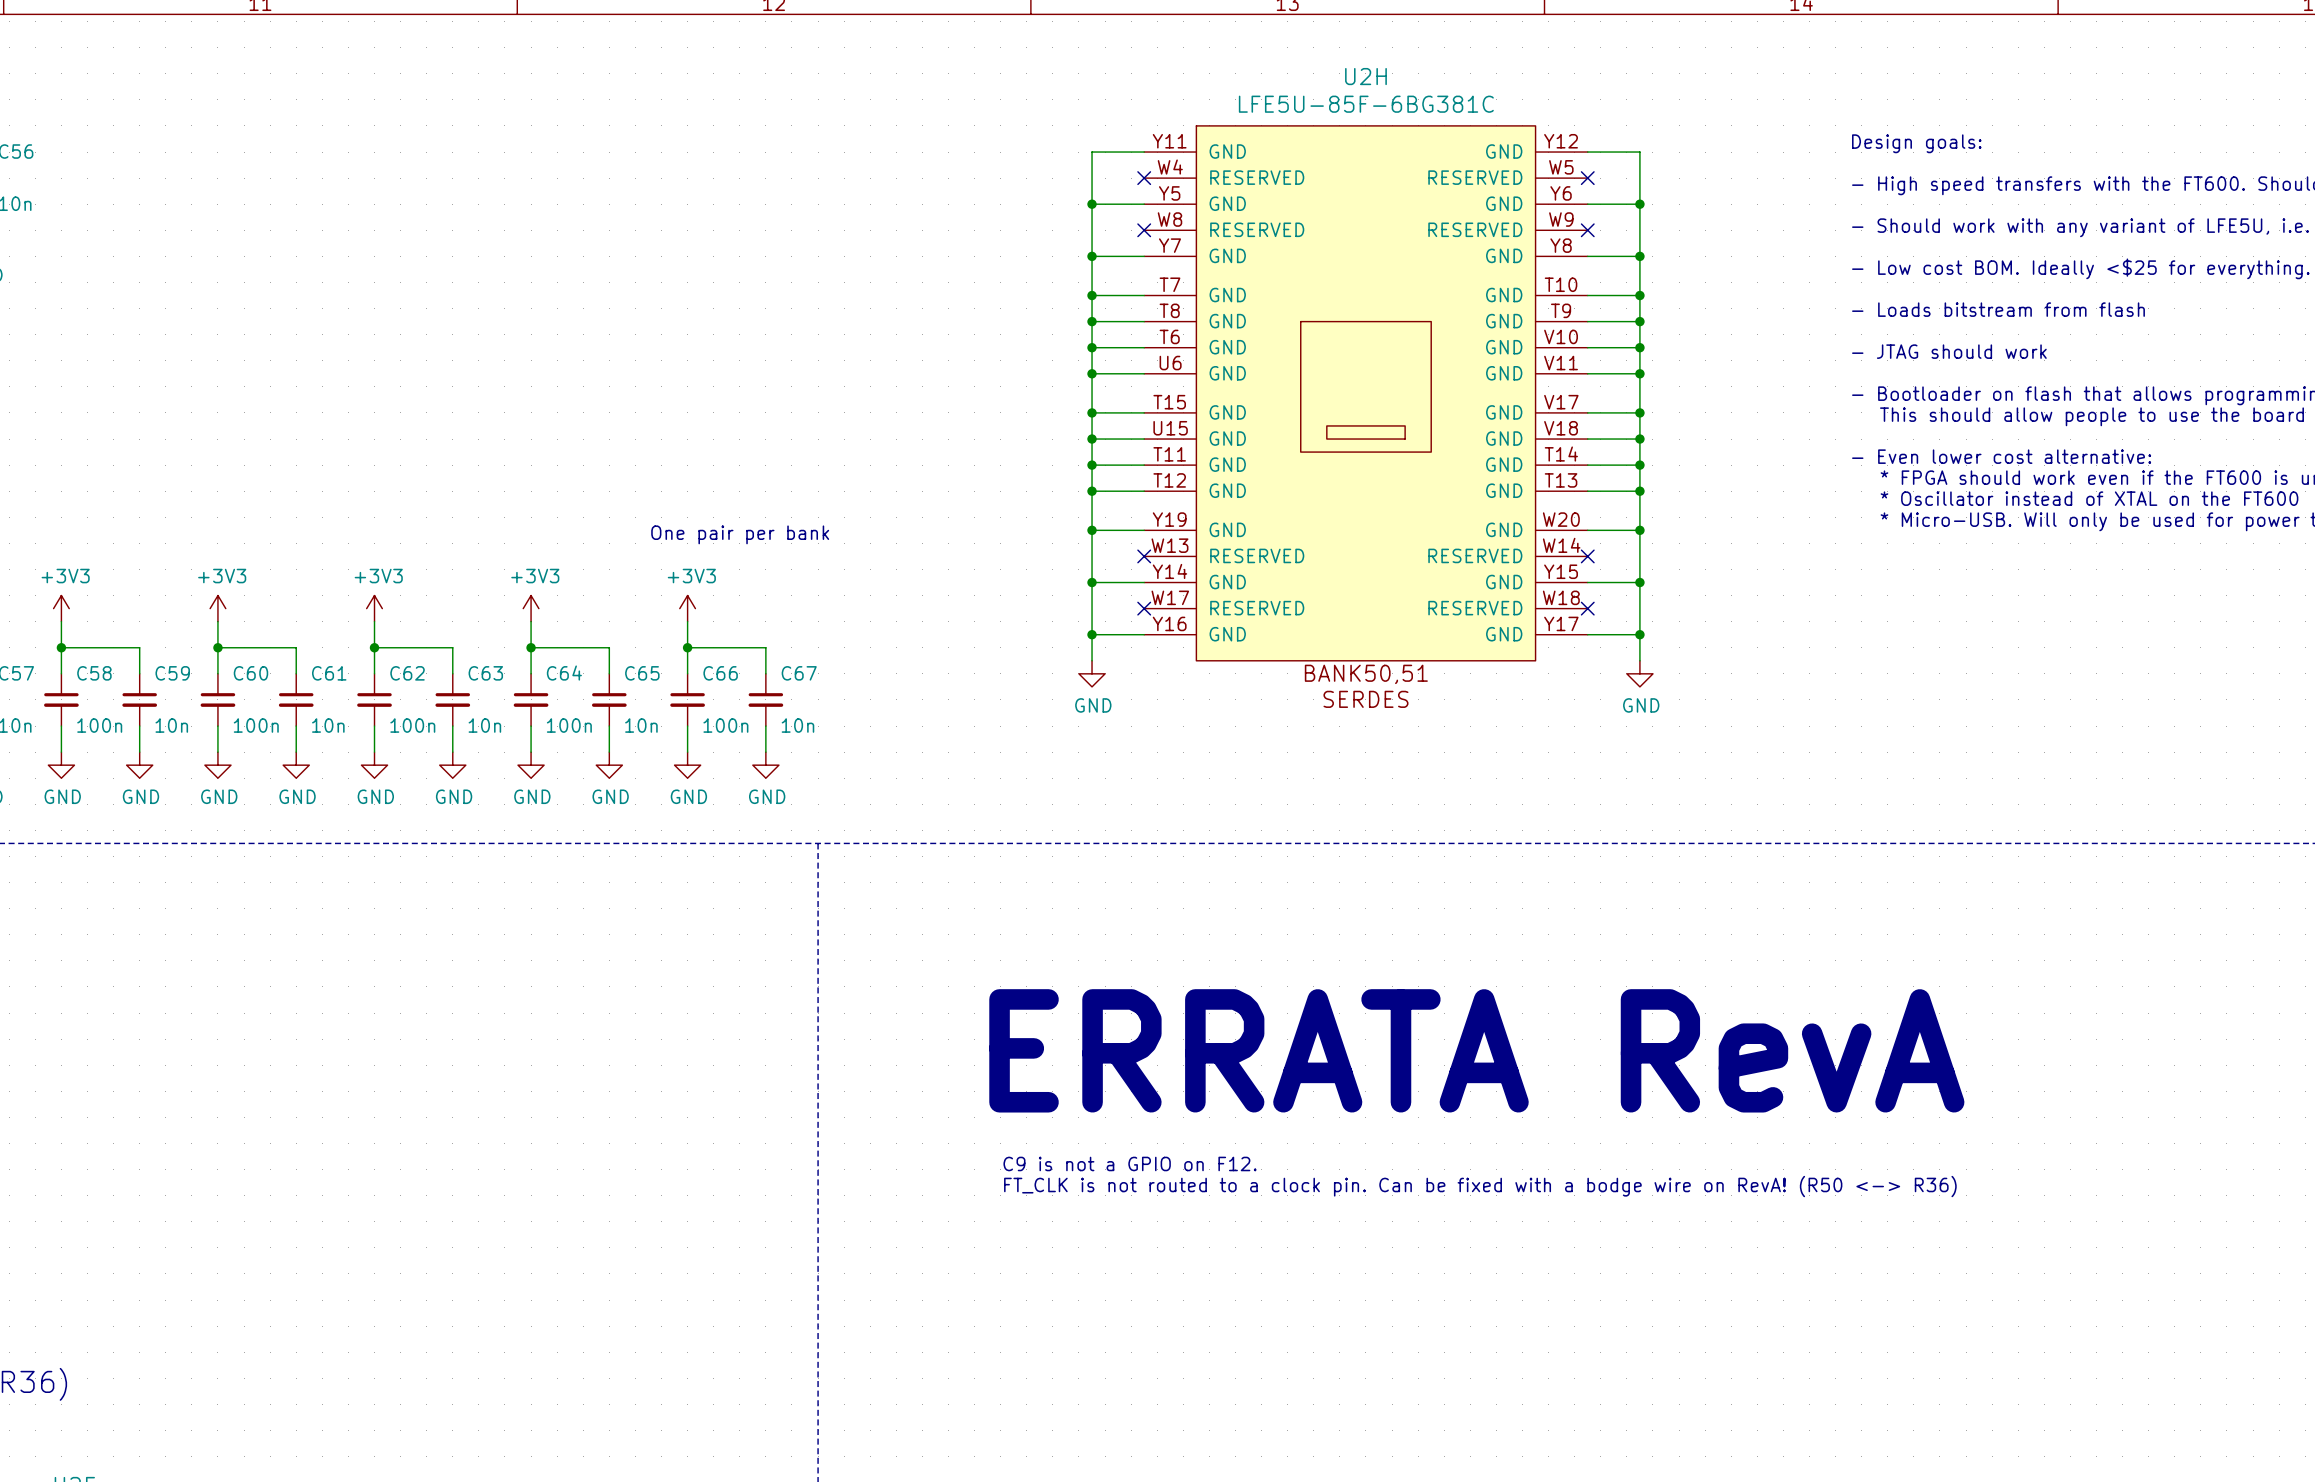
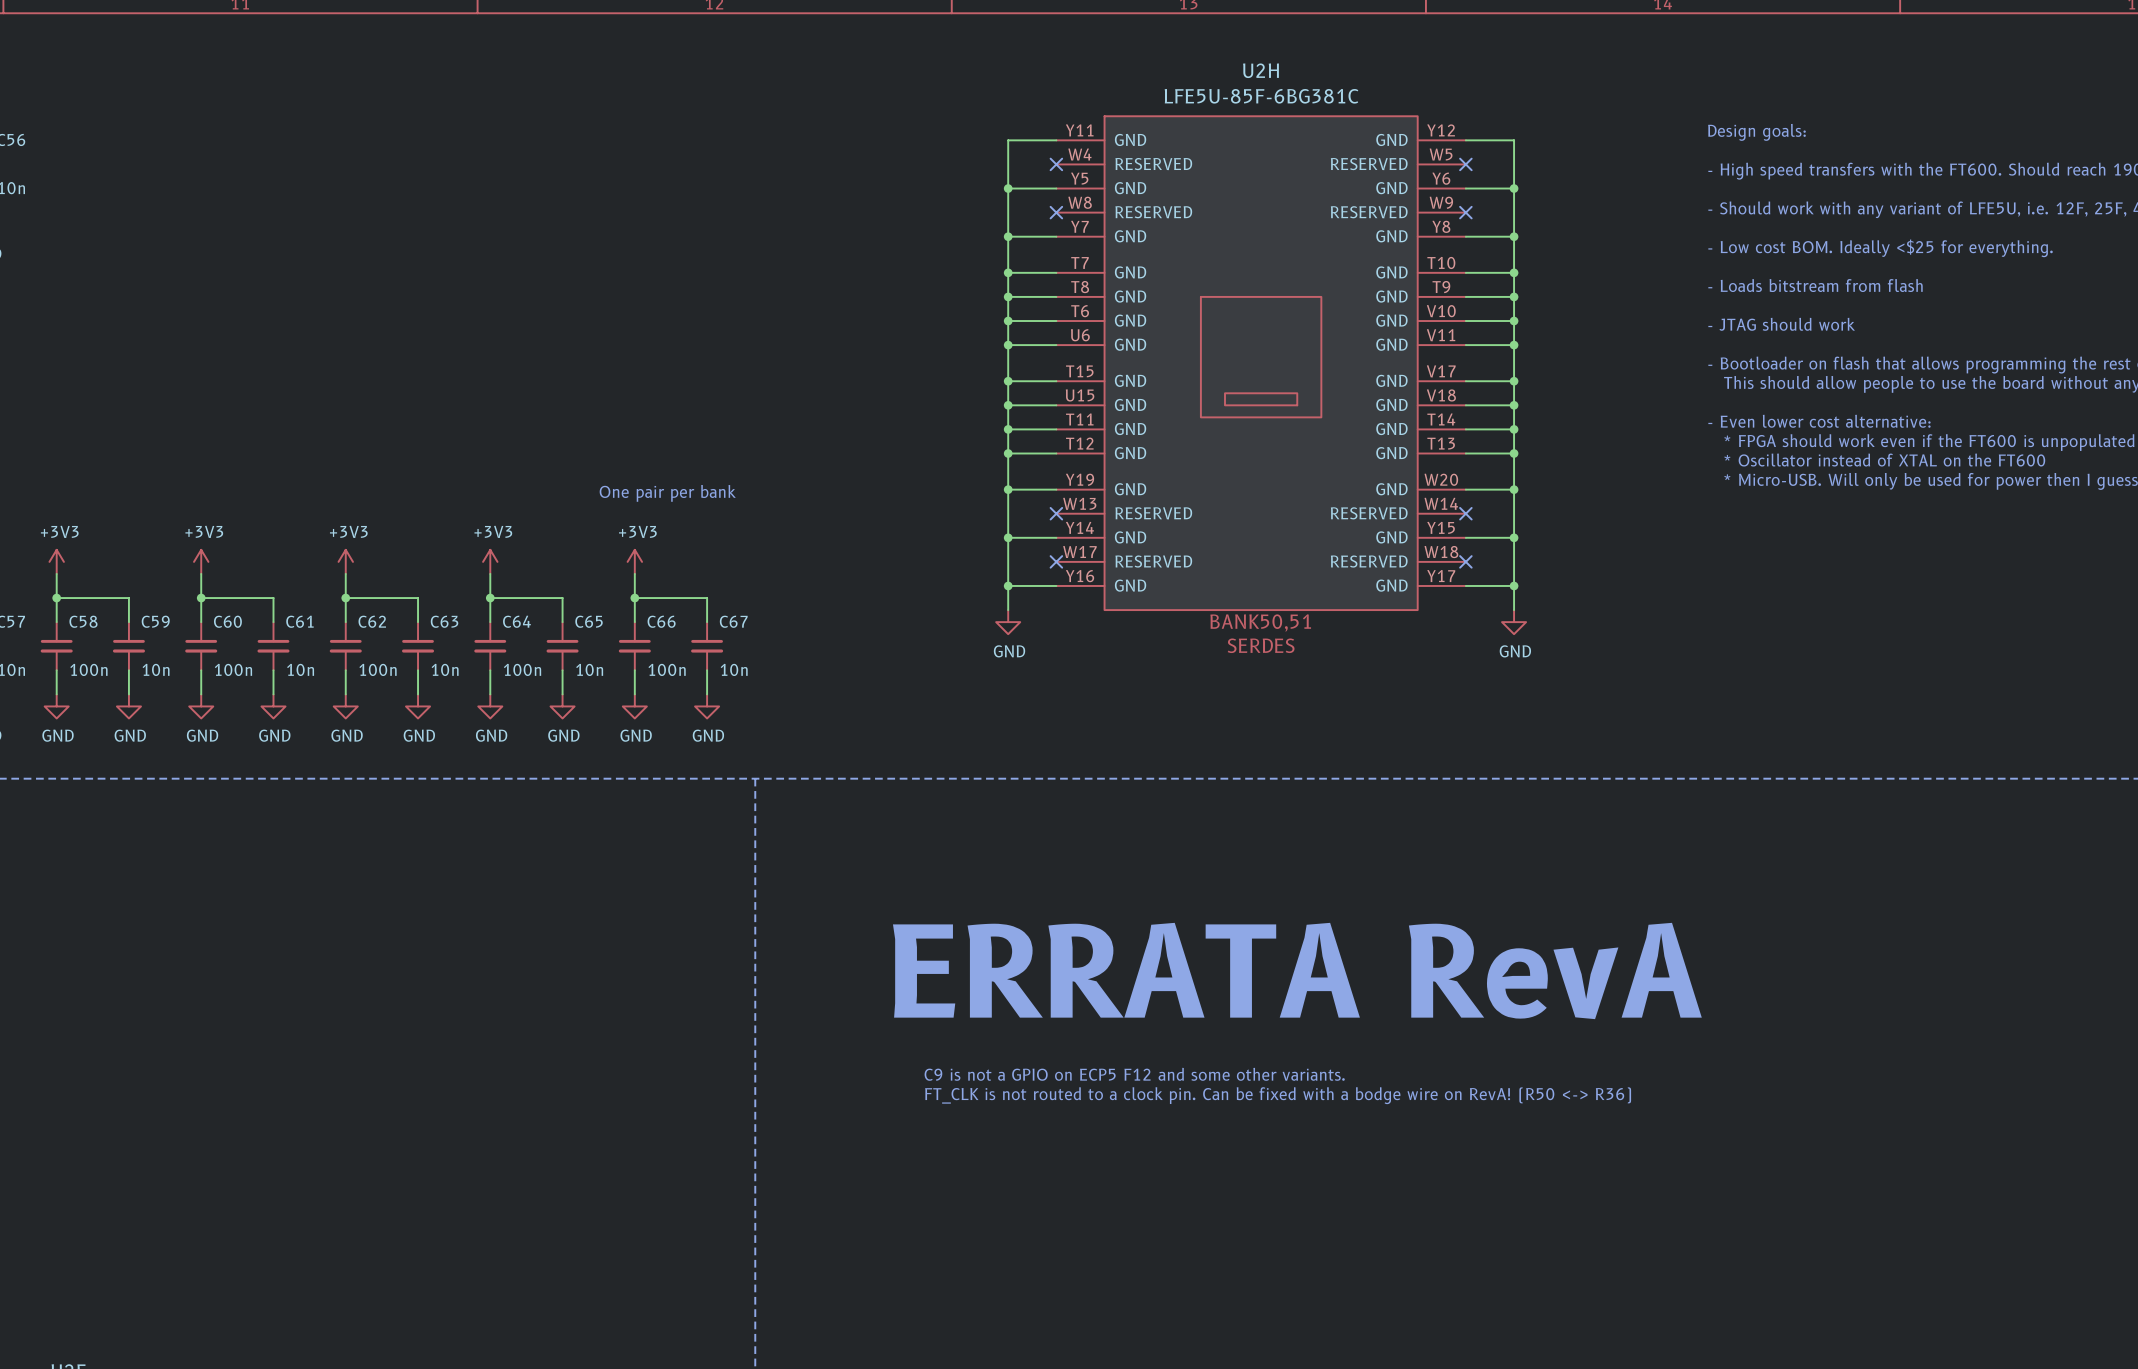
text: C9 is not a GPIO on F12. (1130, 1163) -> C9 is not a GPIO on ECP5 F12 and some other variants. (1134, 1074)

